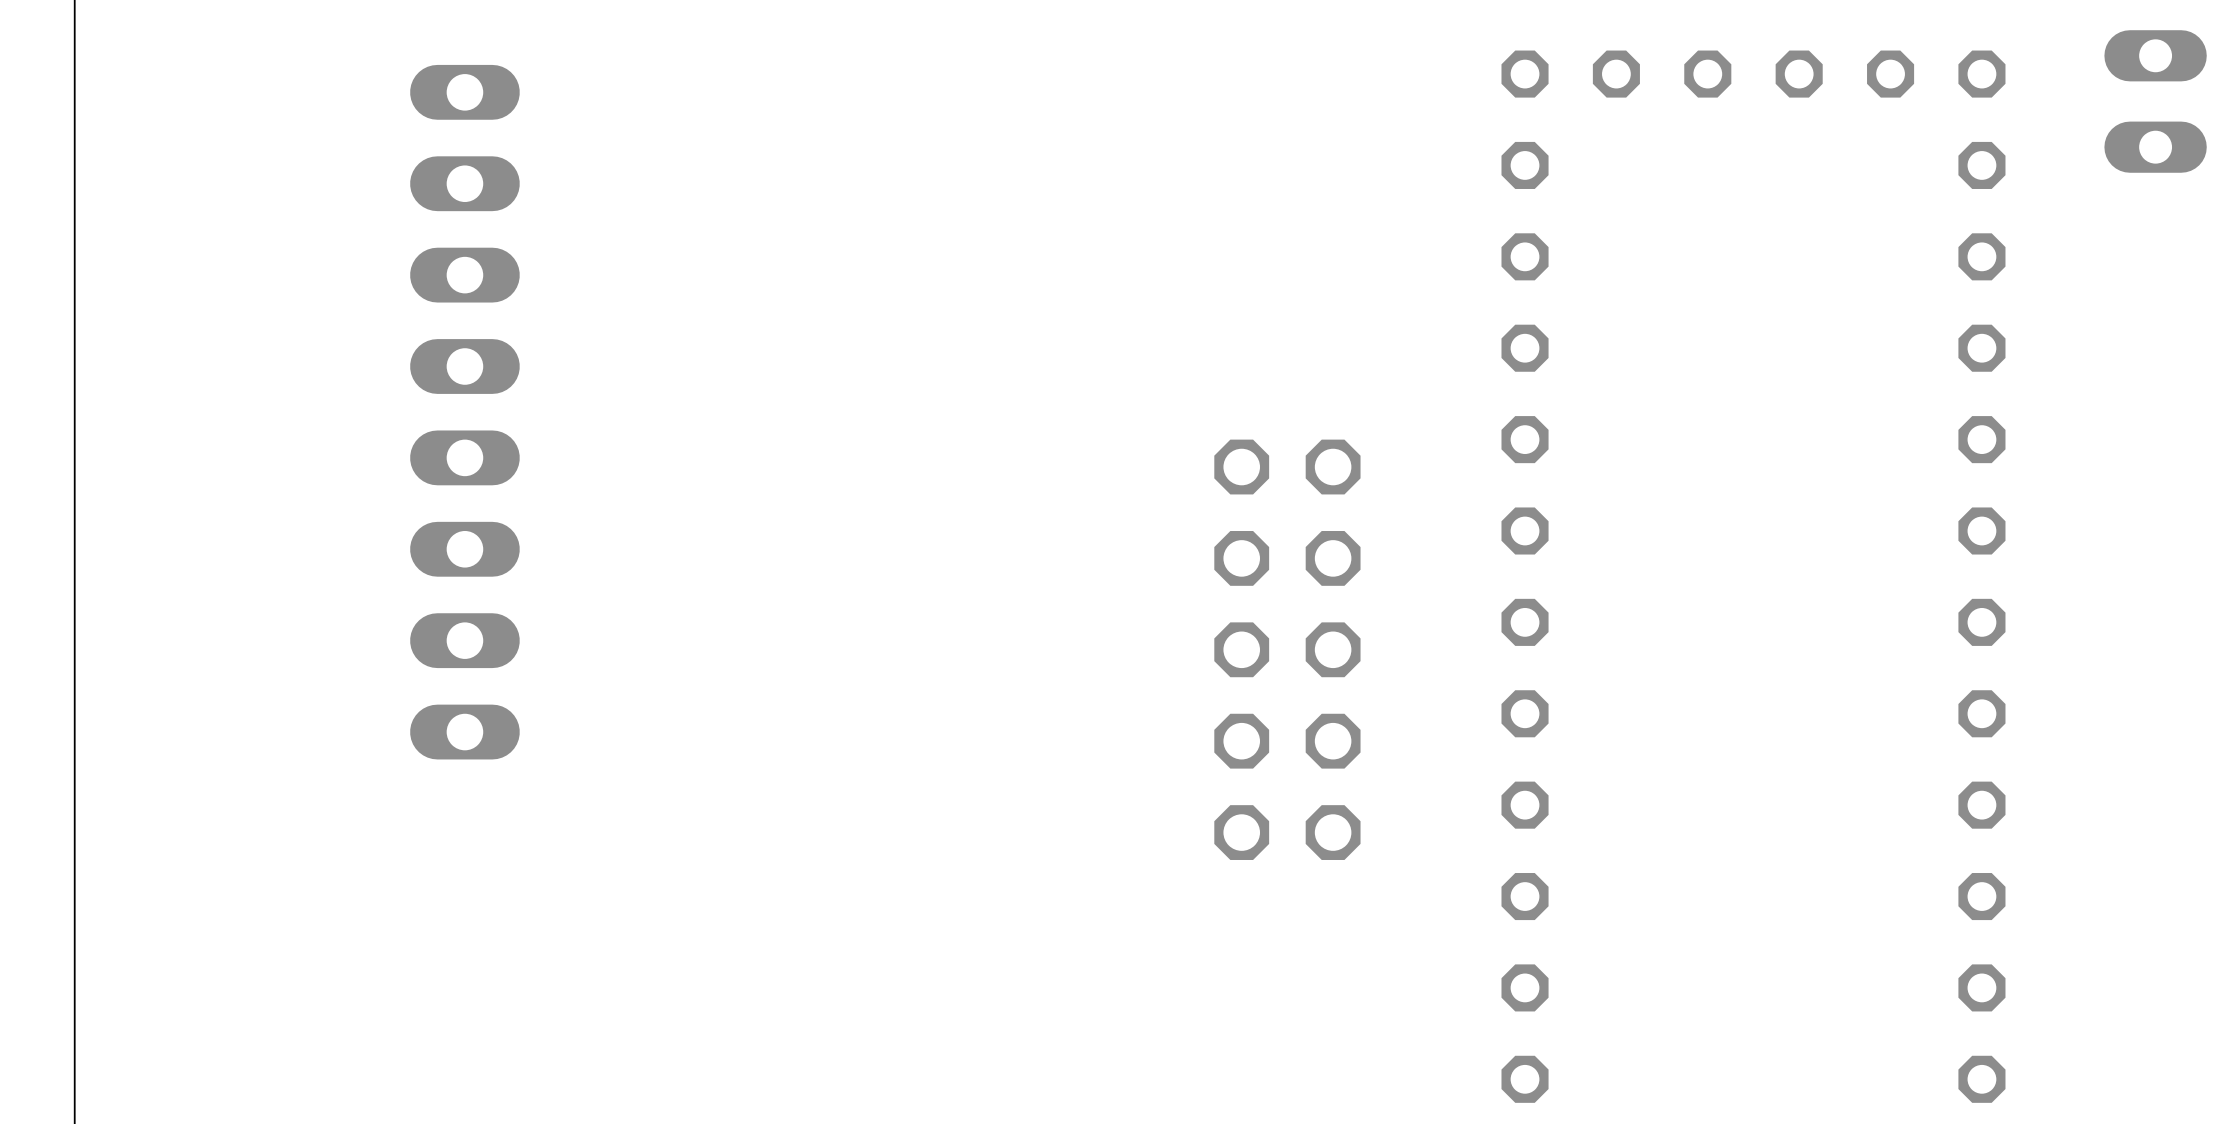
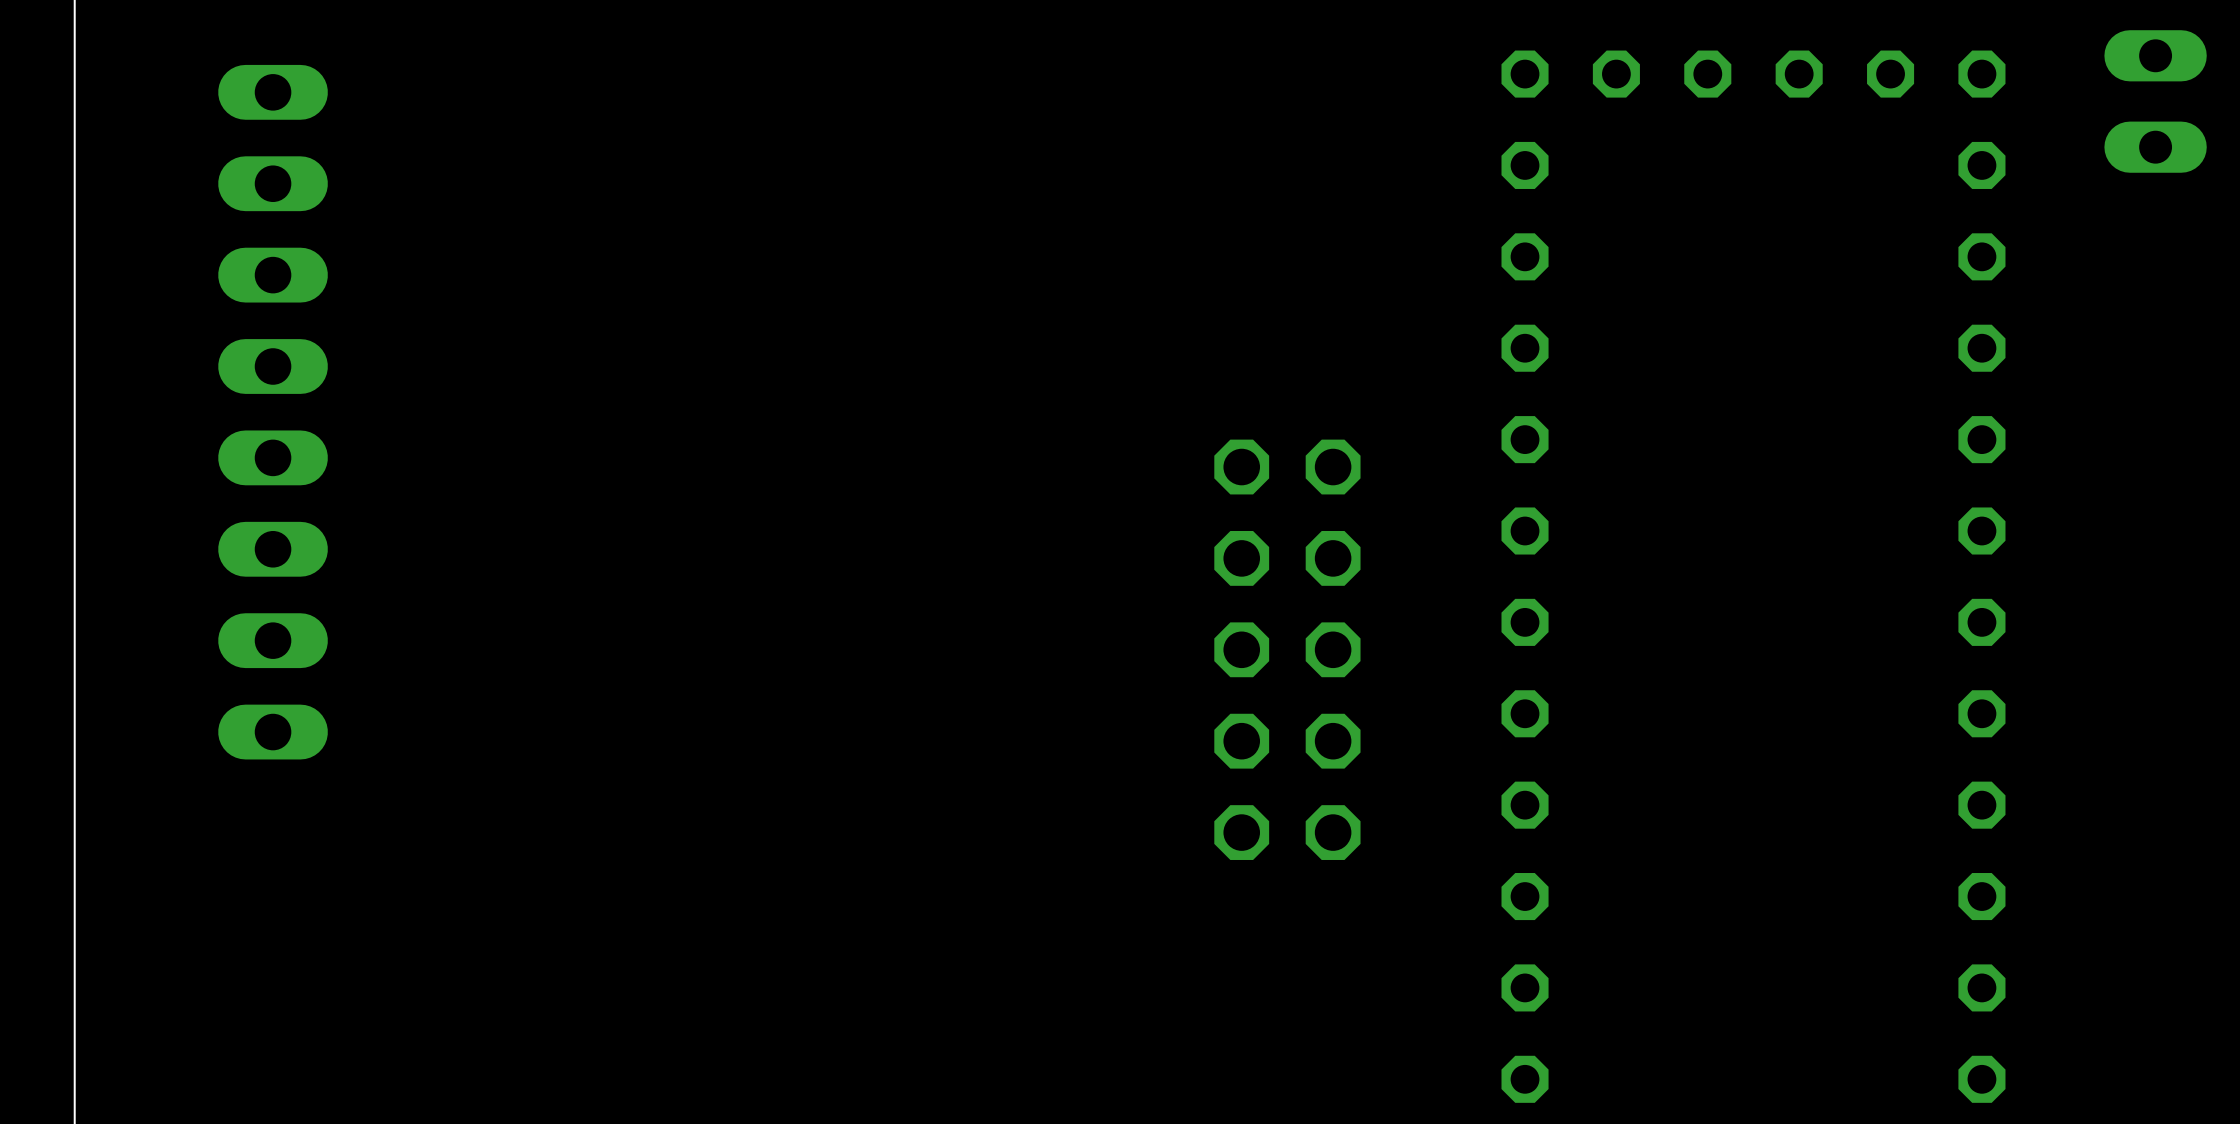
part position: (464, 412) -> (273, 412)

